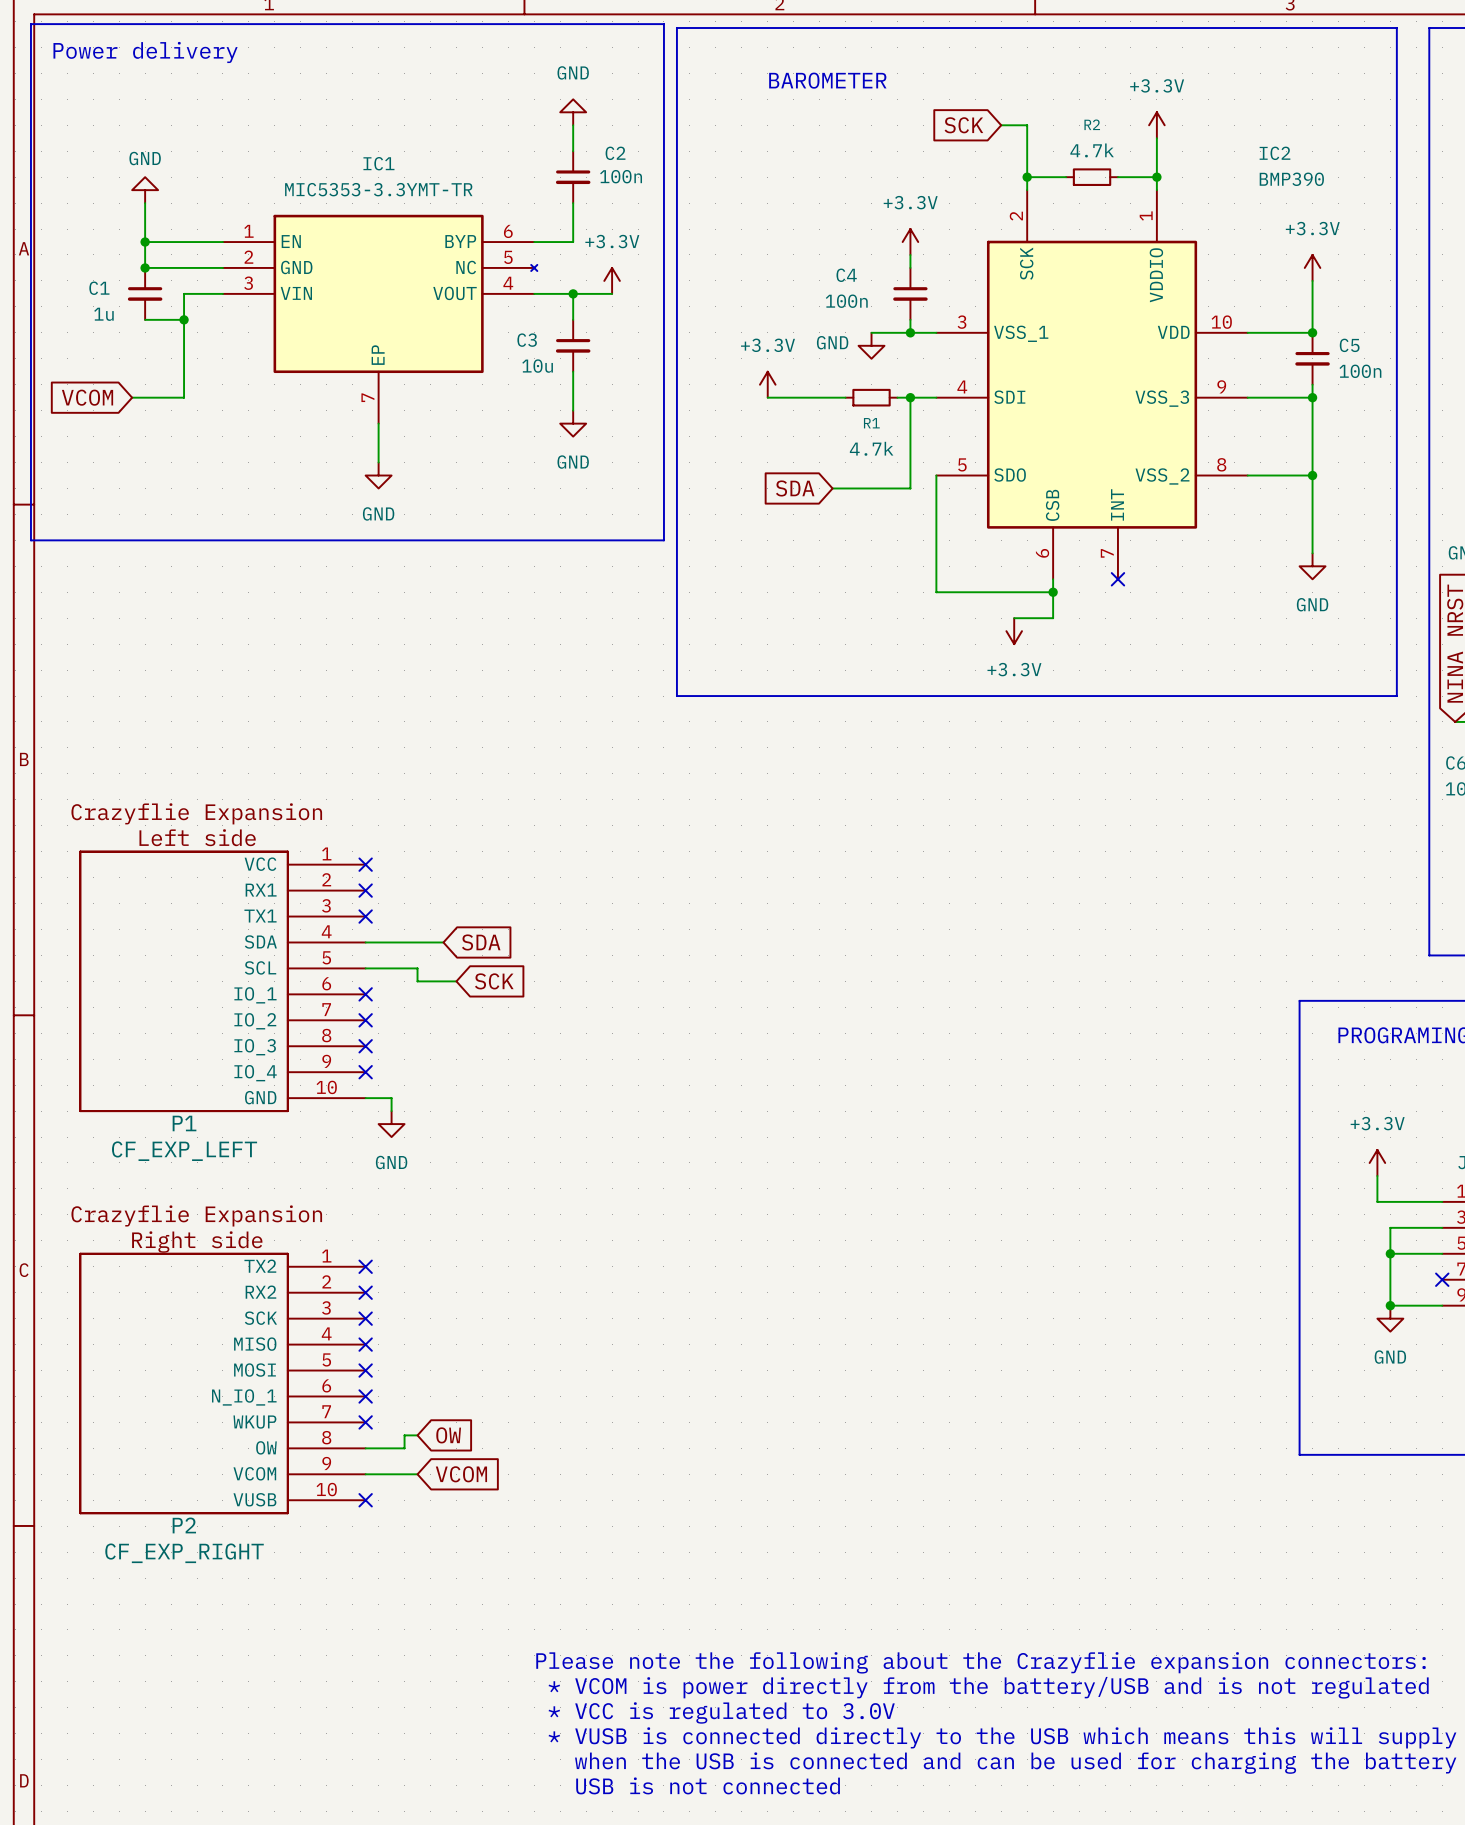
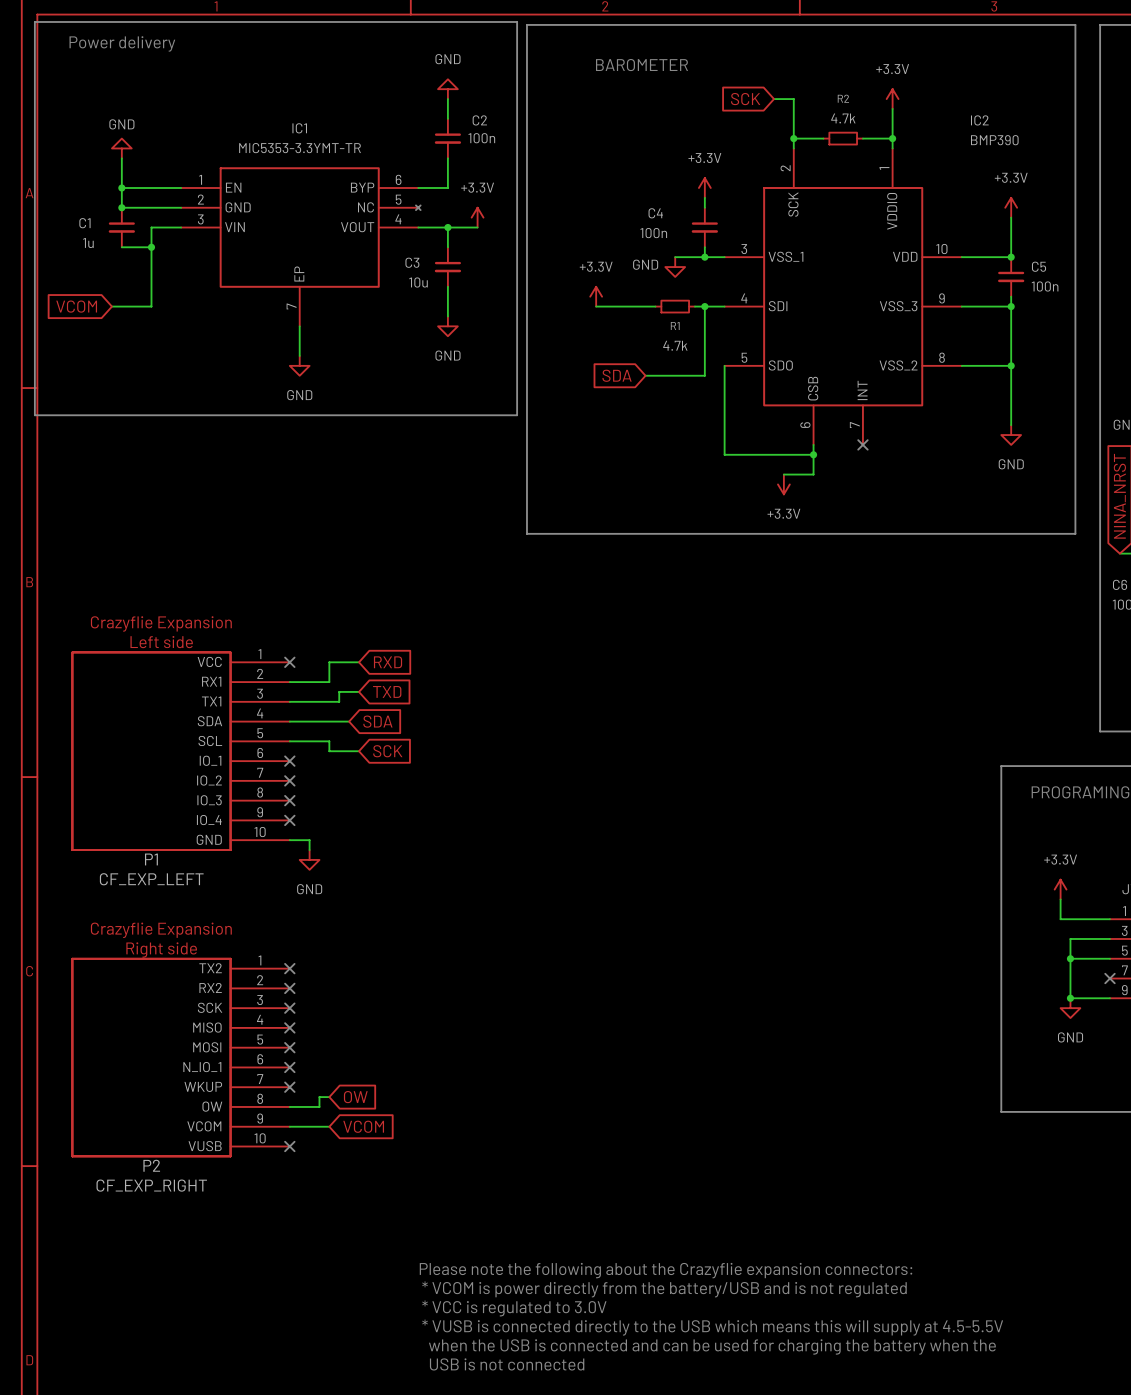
wire: none -> (359, 662) (329, 662) (329, 682) (289, 682)
global label: none -> RXD (388, 662)
no-connect mark: (365, 890) -> none
wire: none -> (359, 691) (339, 691) (339, 701) (289, 701)
global label: none -> TXD (387, 691)
no-connect mark: (365, 916) -> none

